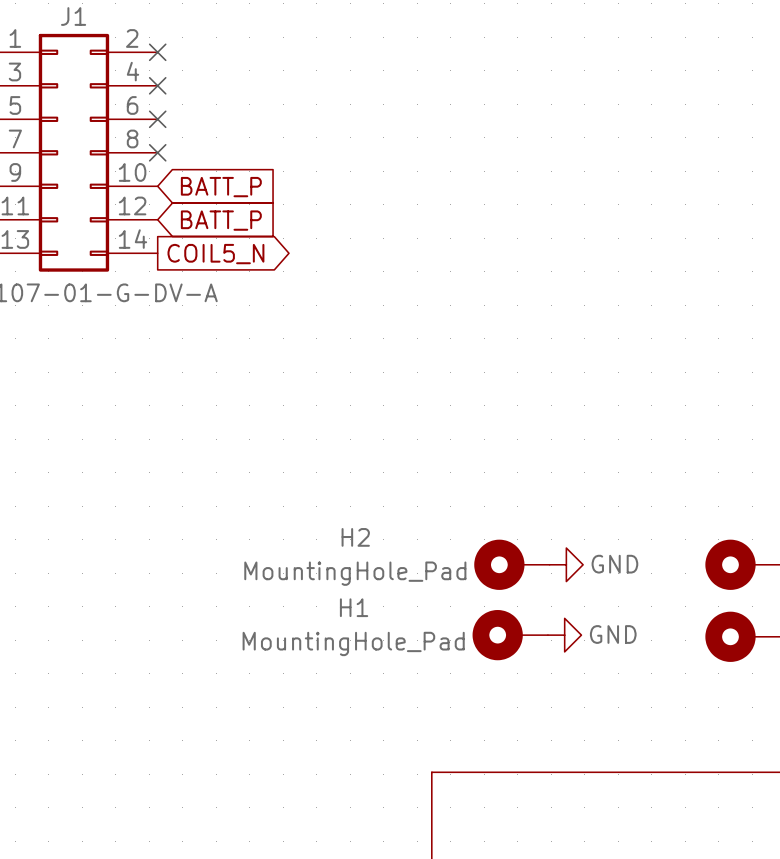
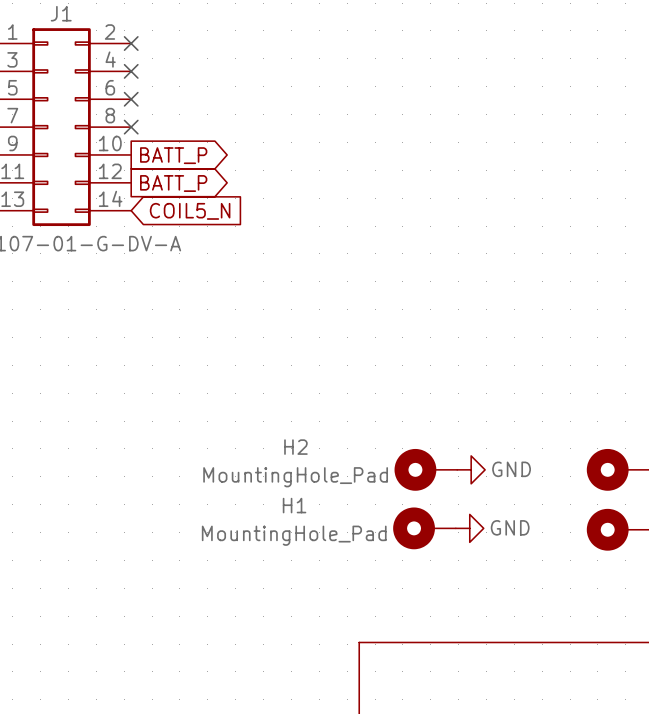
global label shape: input (221, 187) -> output (173, 155)
global label shape: input (221, 220) -> output (173, 183)
global label shape: output (215, 254) -> input (190, 211)

